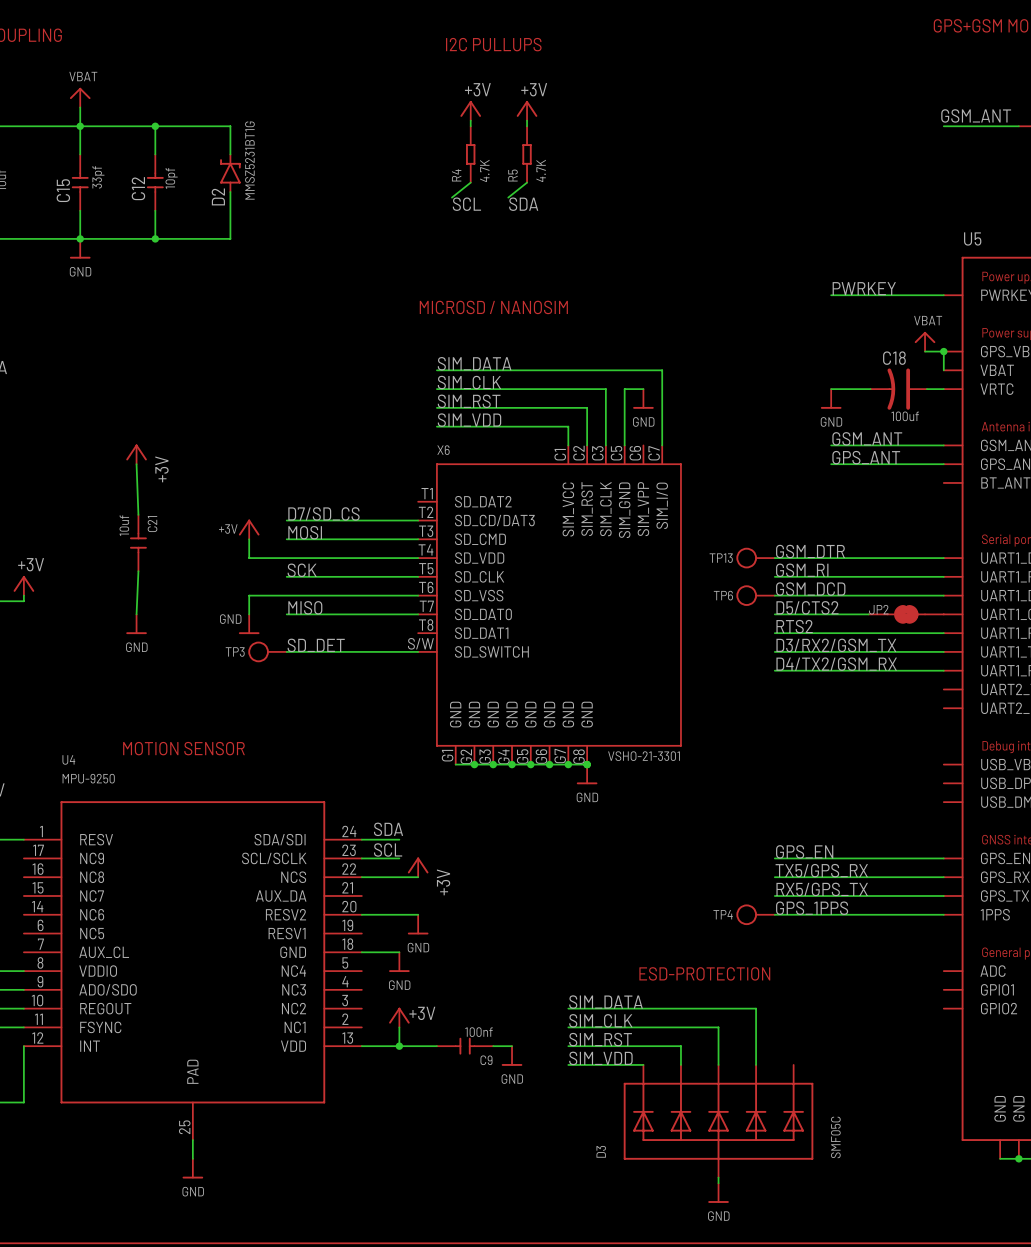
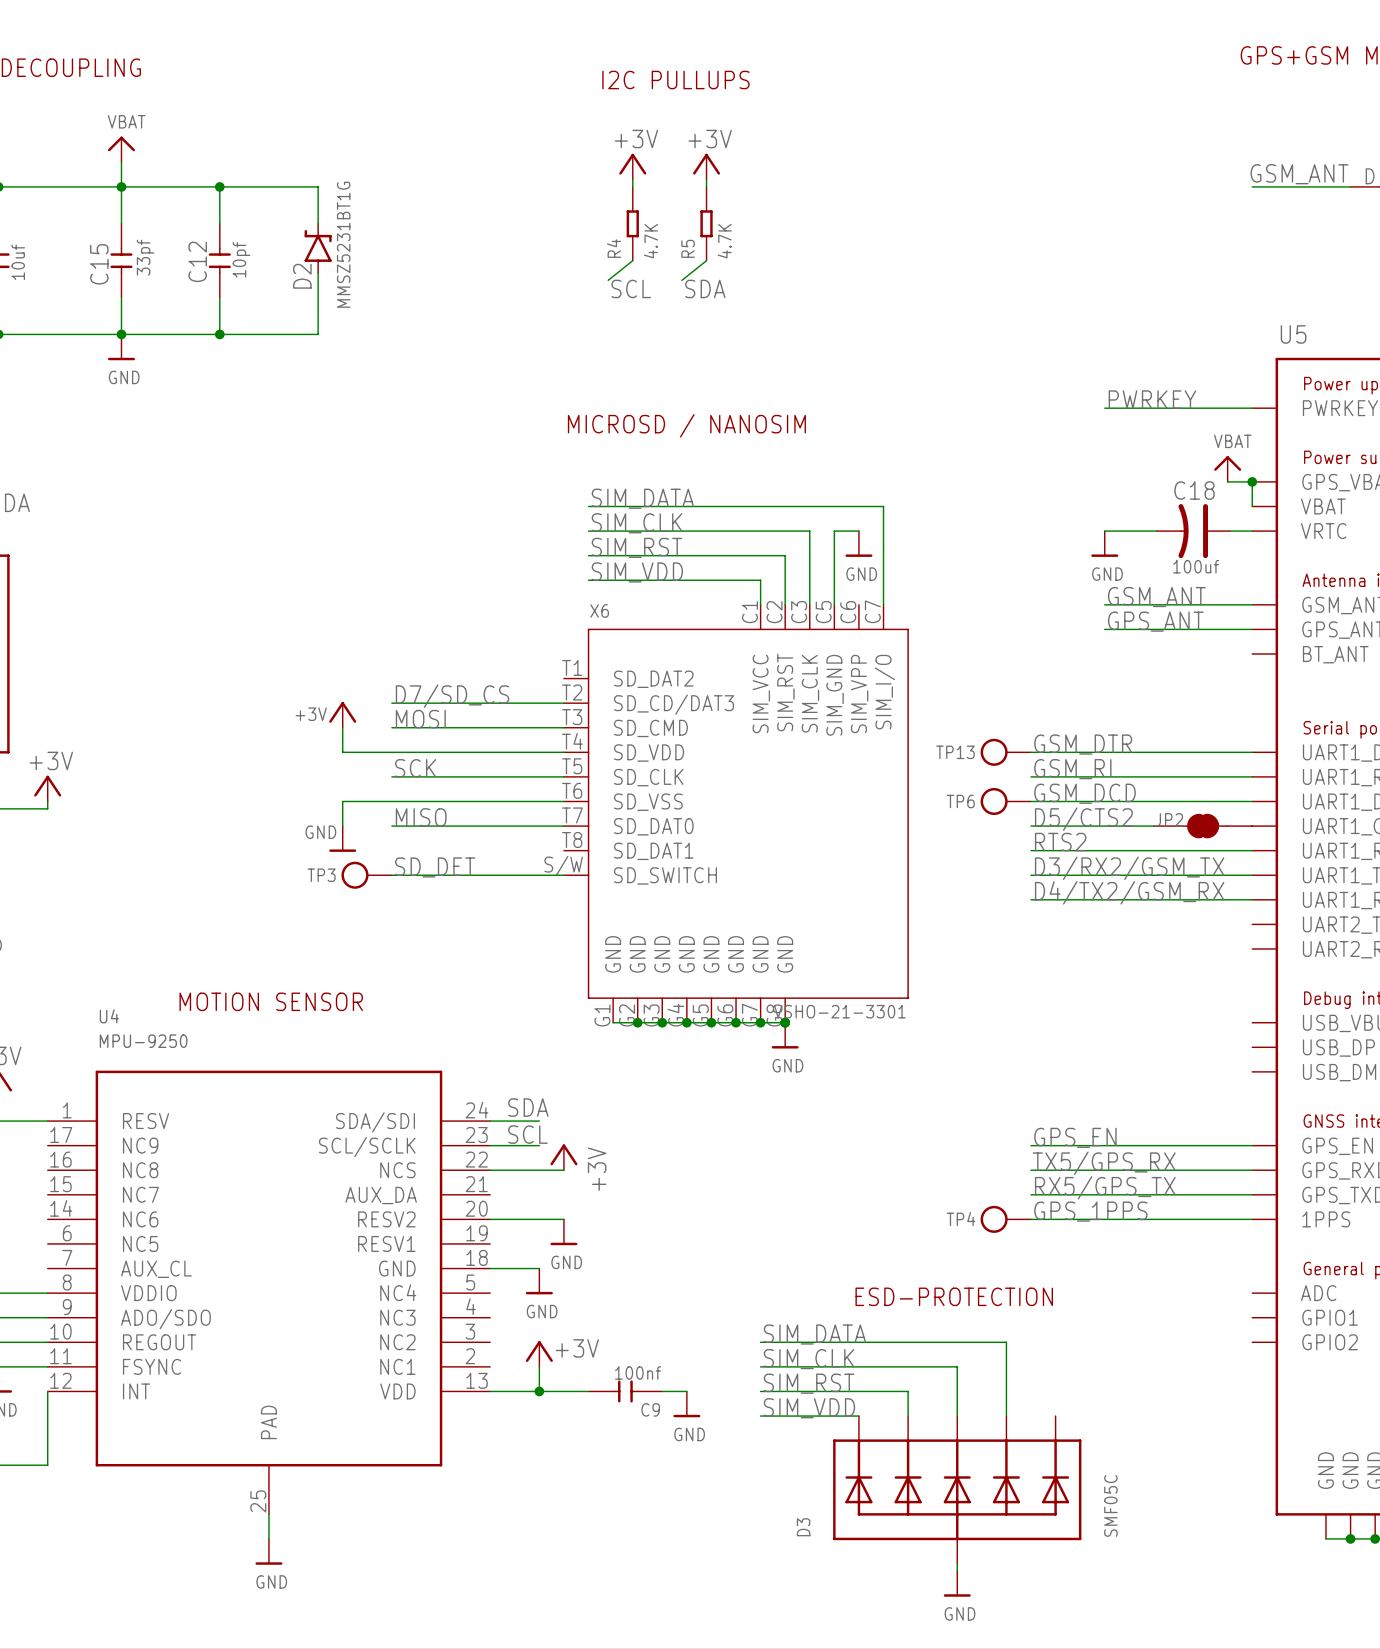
power symbol: +3V (136, 454) -> none
wire: (136, 464) (138, 514) -> none
C21: 10uf (138, 543) -> none
wire: (138, 571) (136, 614) -> none
power symbol: GND (136, 624) -> none

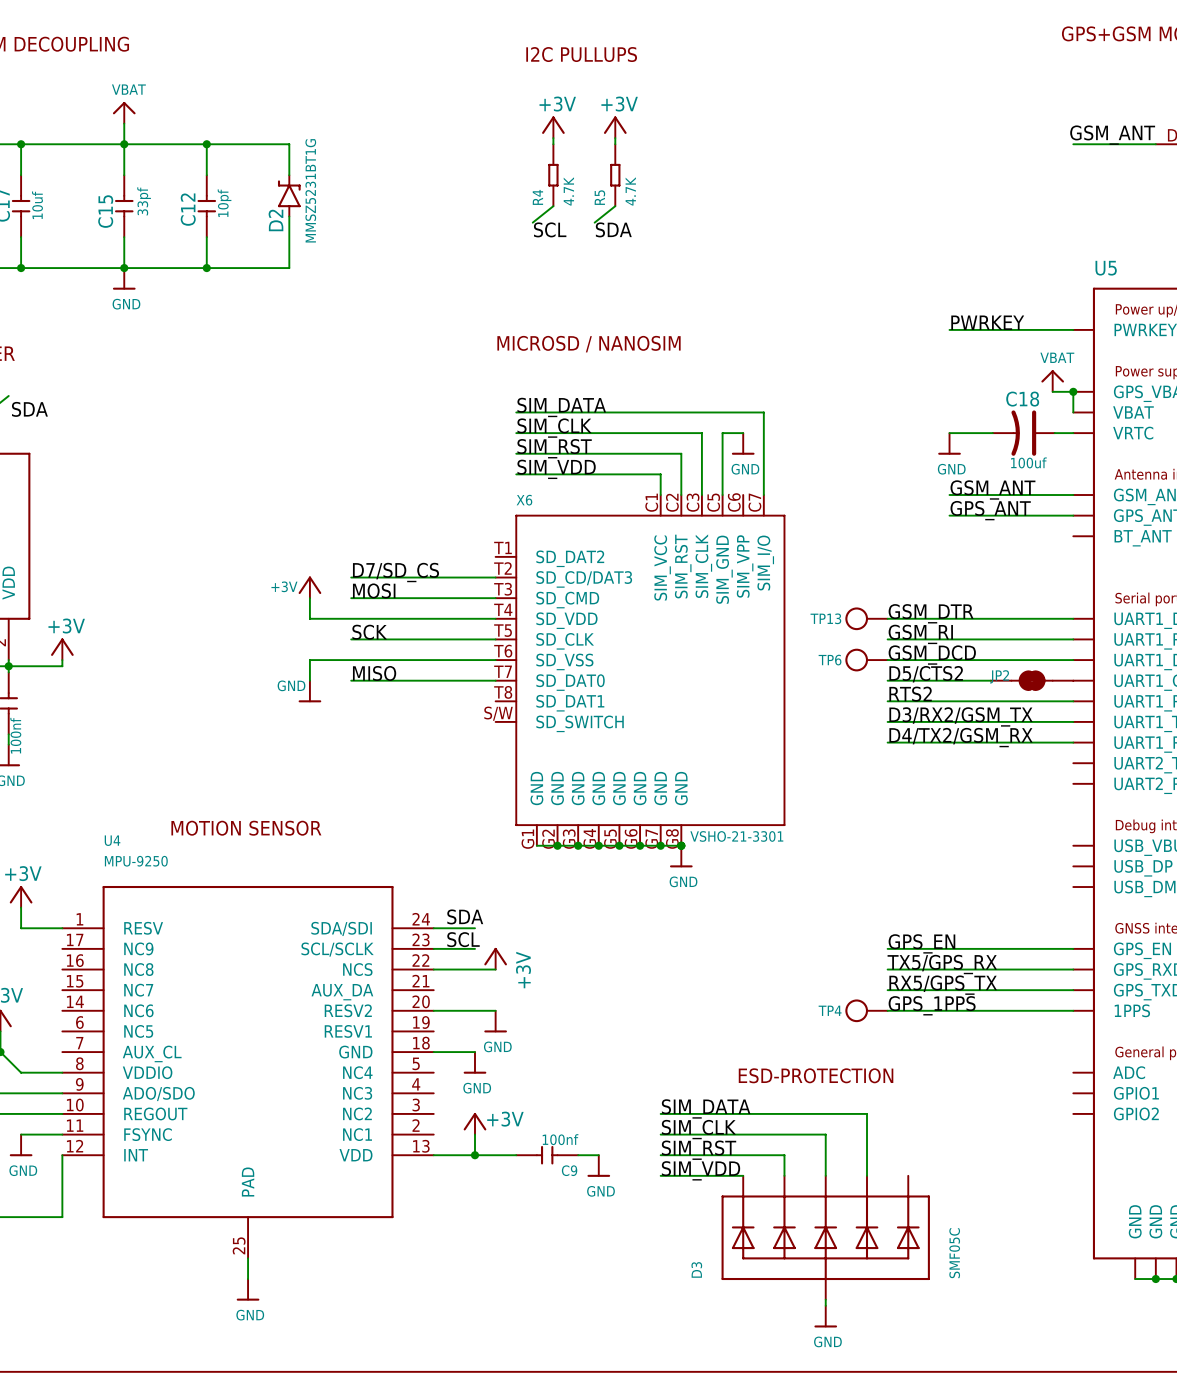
label: SD_DET (435, 867) -> none
TP3: (366, 875) -> none
wire: (391, 875) (563, 875) -> none

